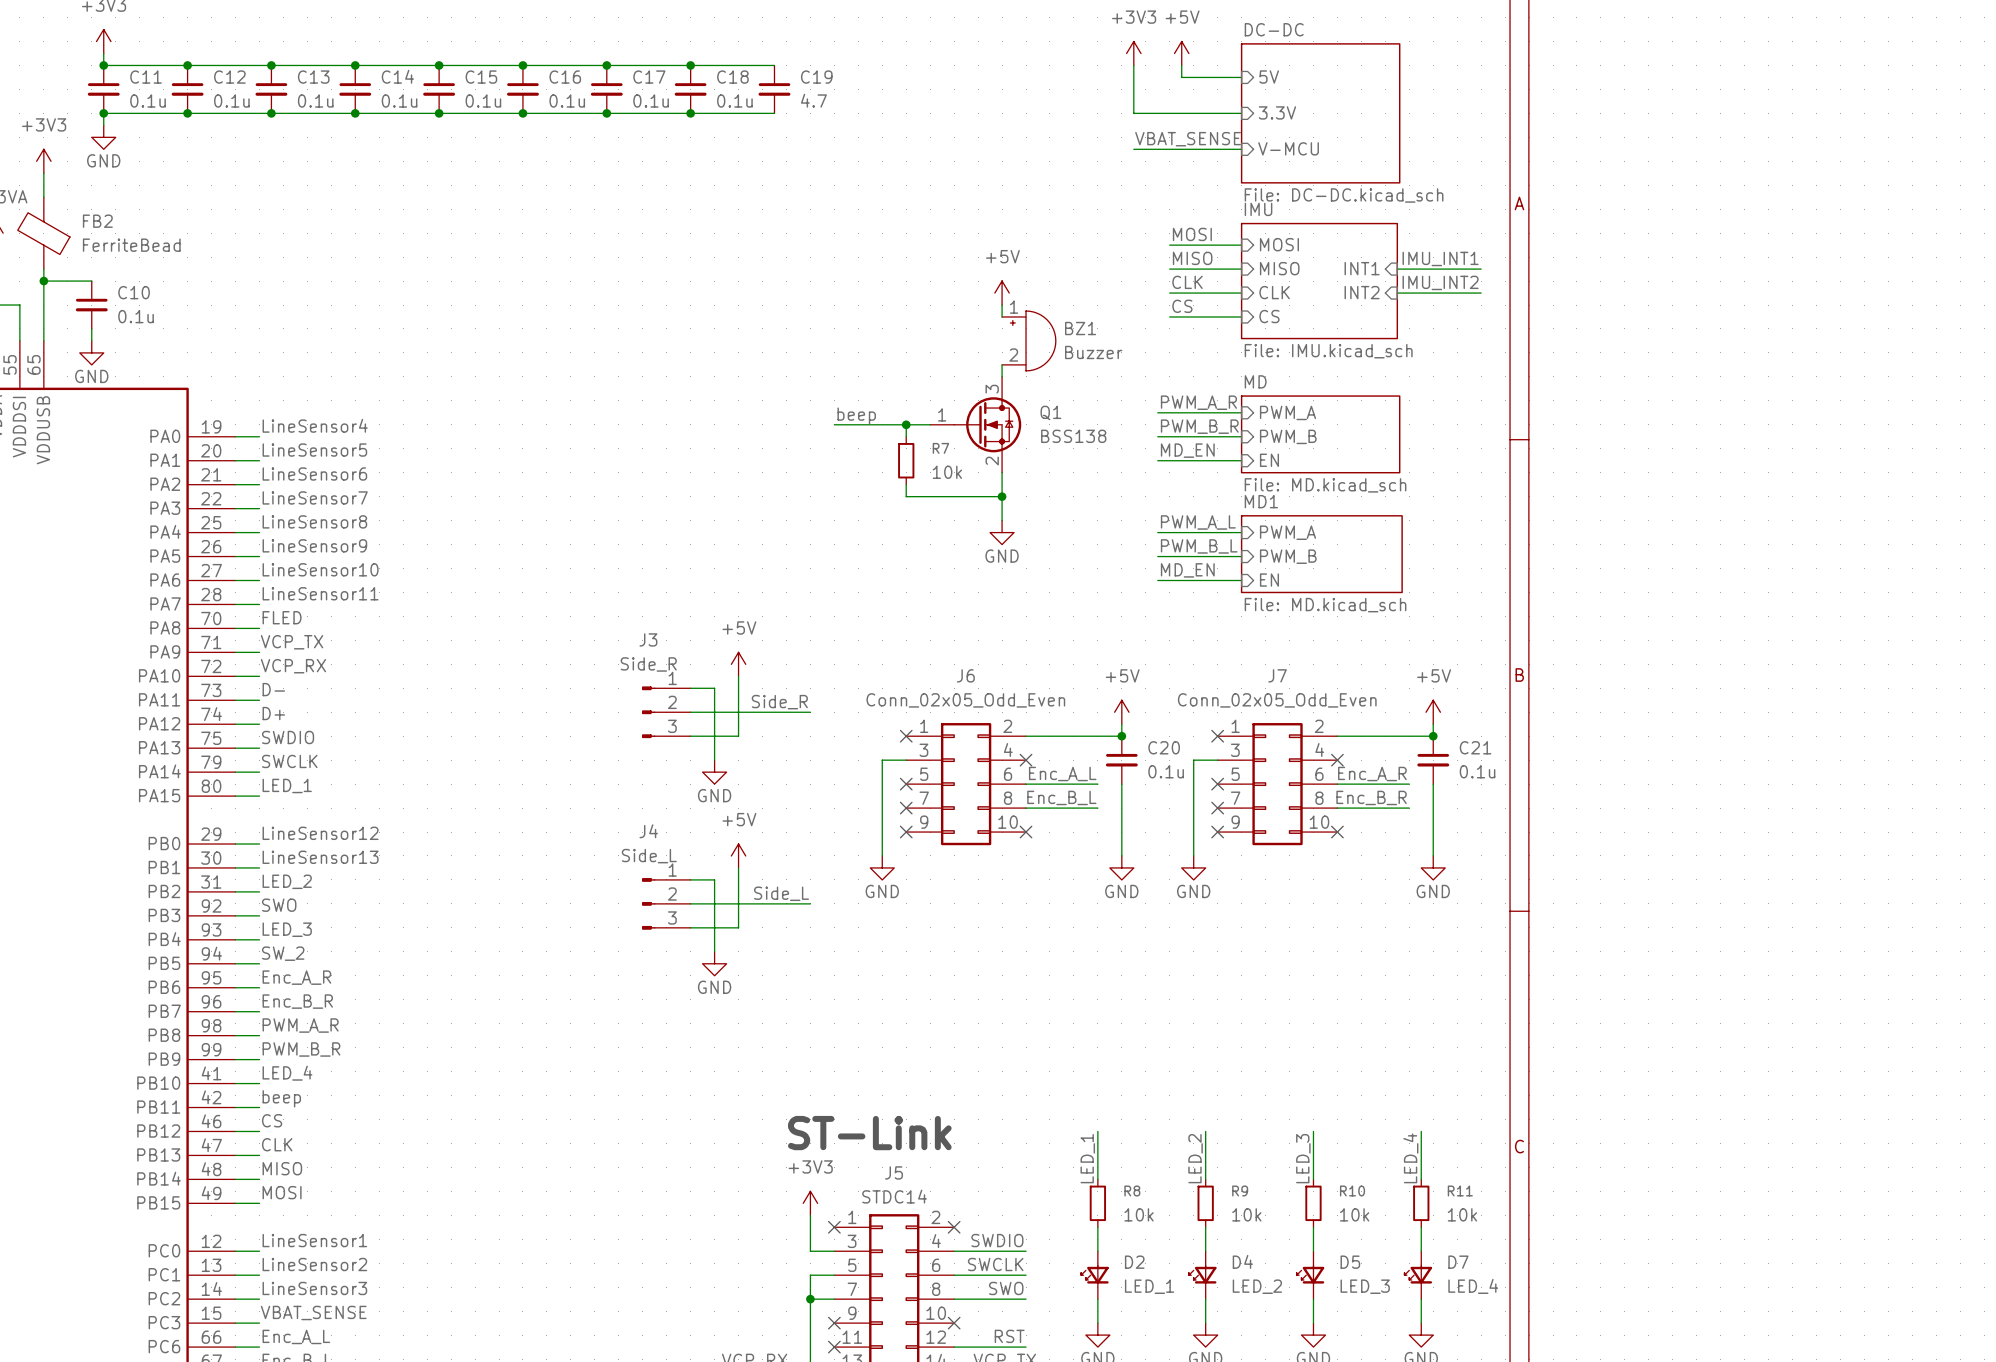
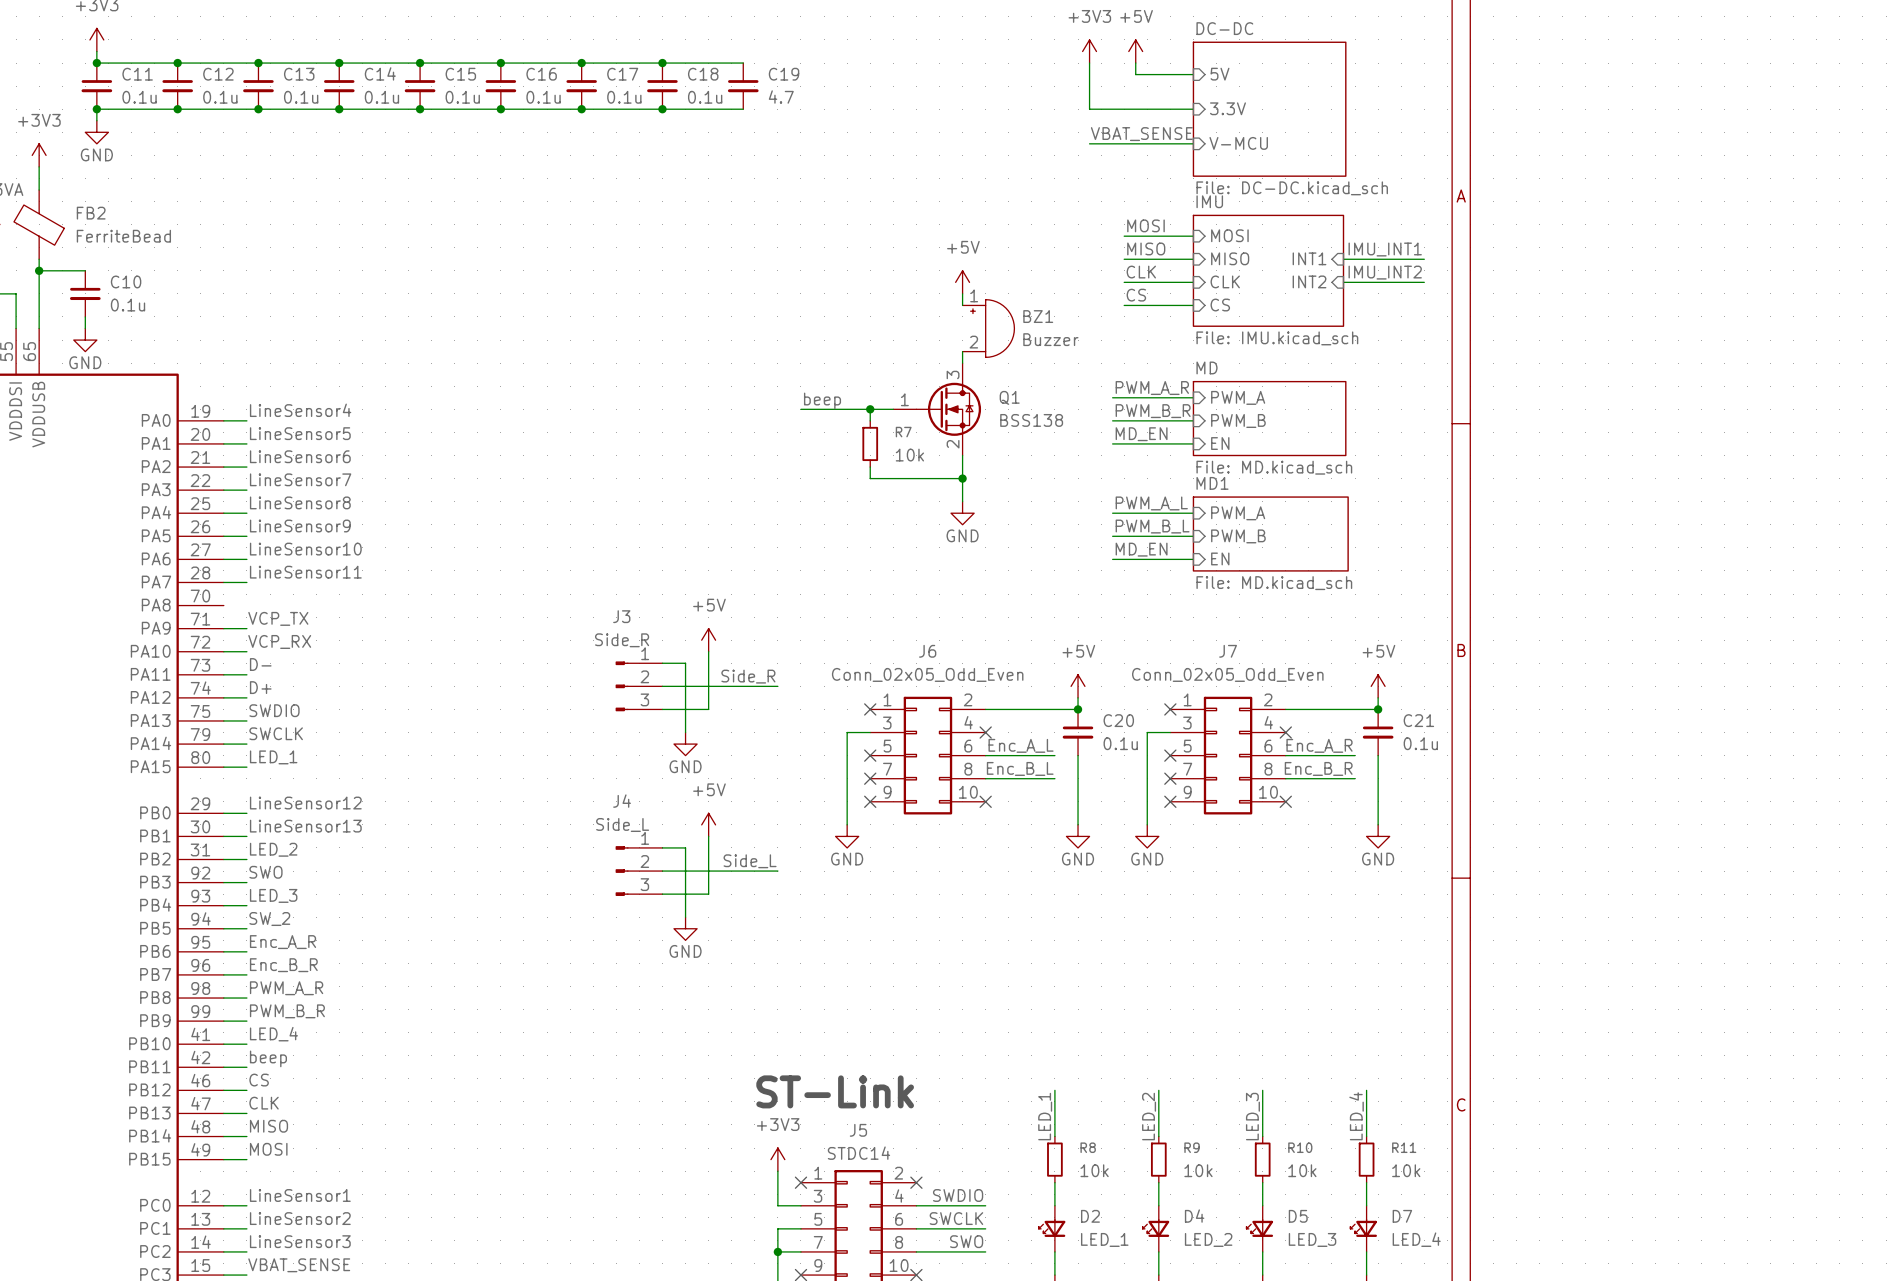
label: FLED (282, 617) -> none
wire: (235, 628) (259, 628) -> none

